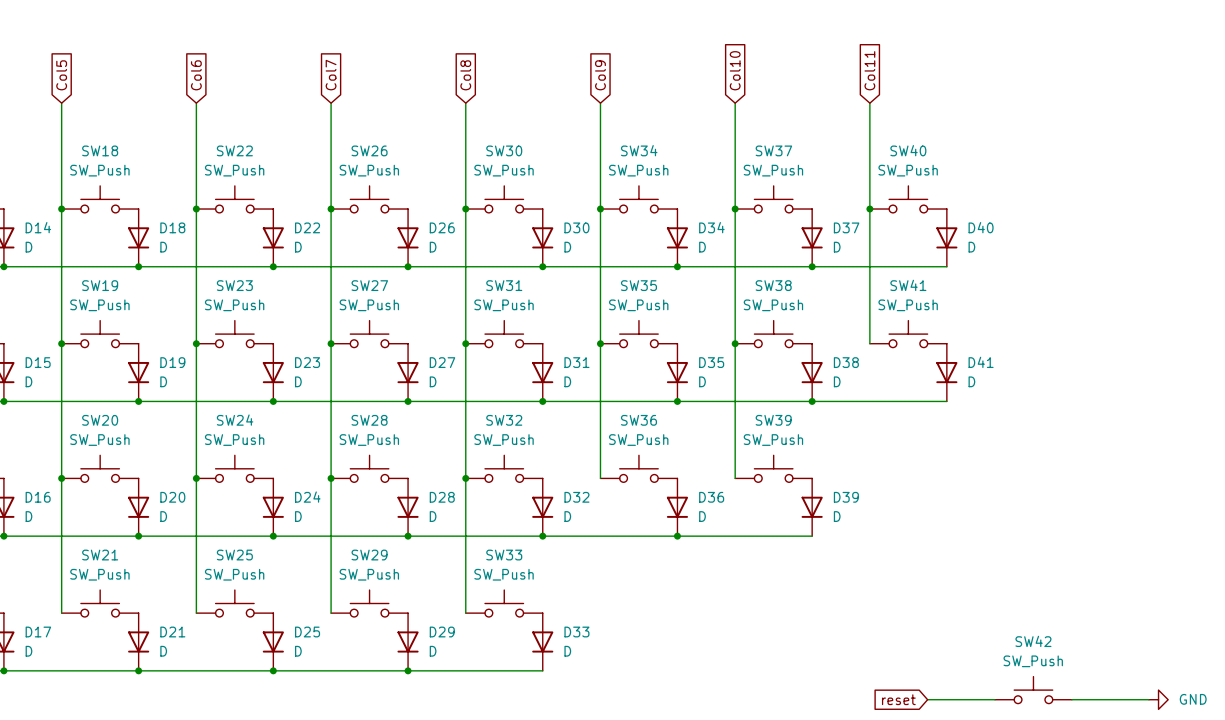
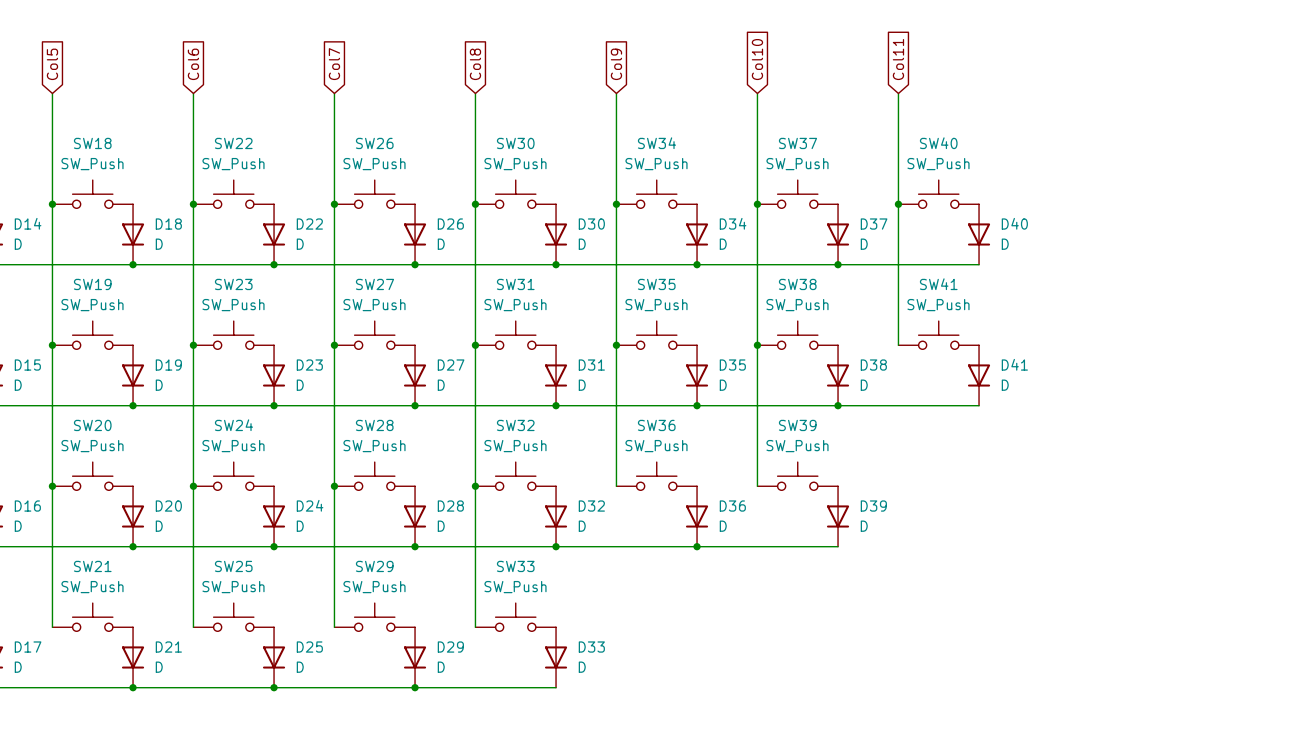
SW42: SW_Push (1033, 690) -> none
global label: reset (898, 699) -> none
wire: (927, 699) (994, 699) -> none
wire: (1071, 699) (1148, 699) -> none
power symbol: GND (1158, 699) -> none

